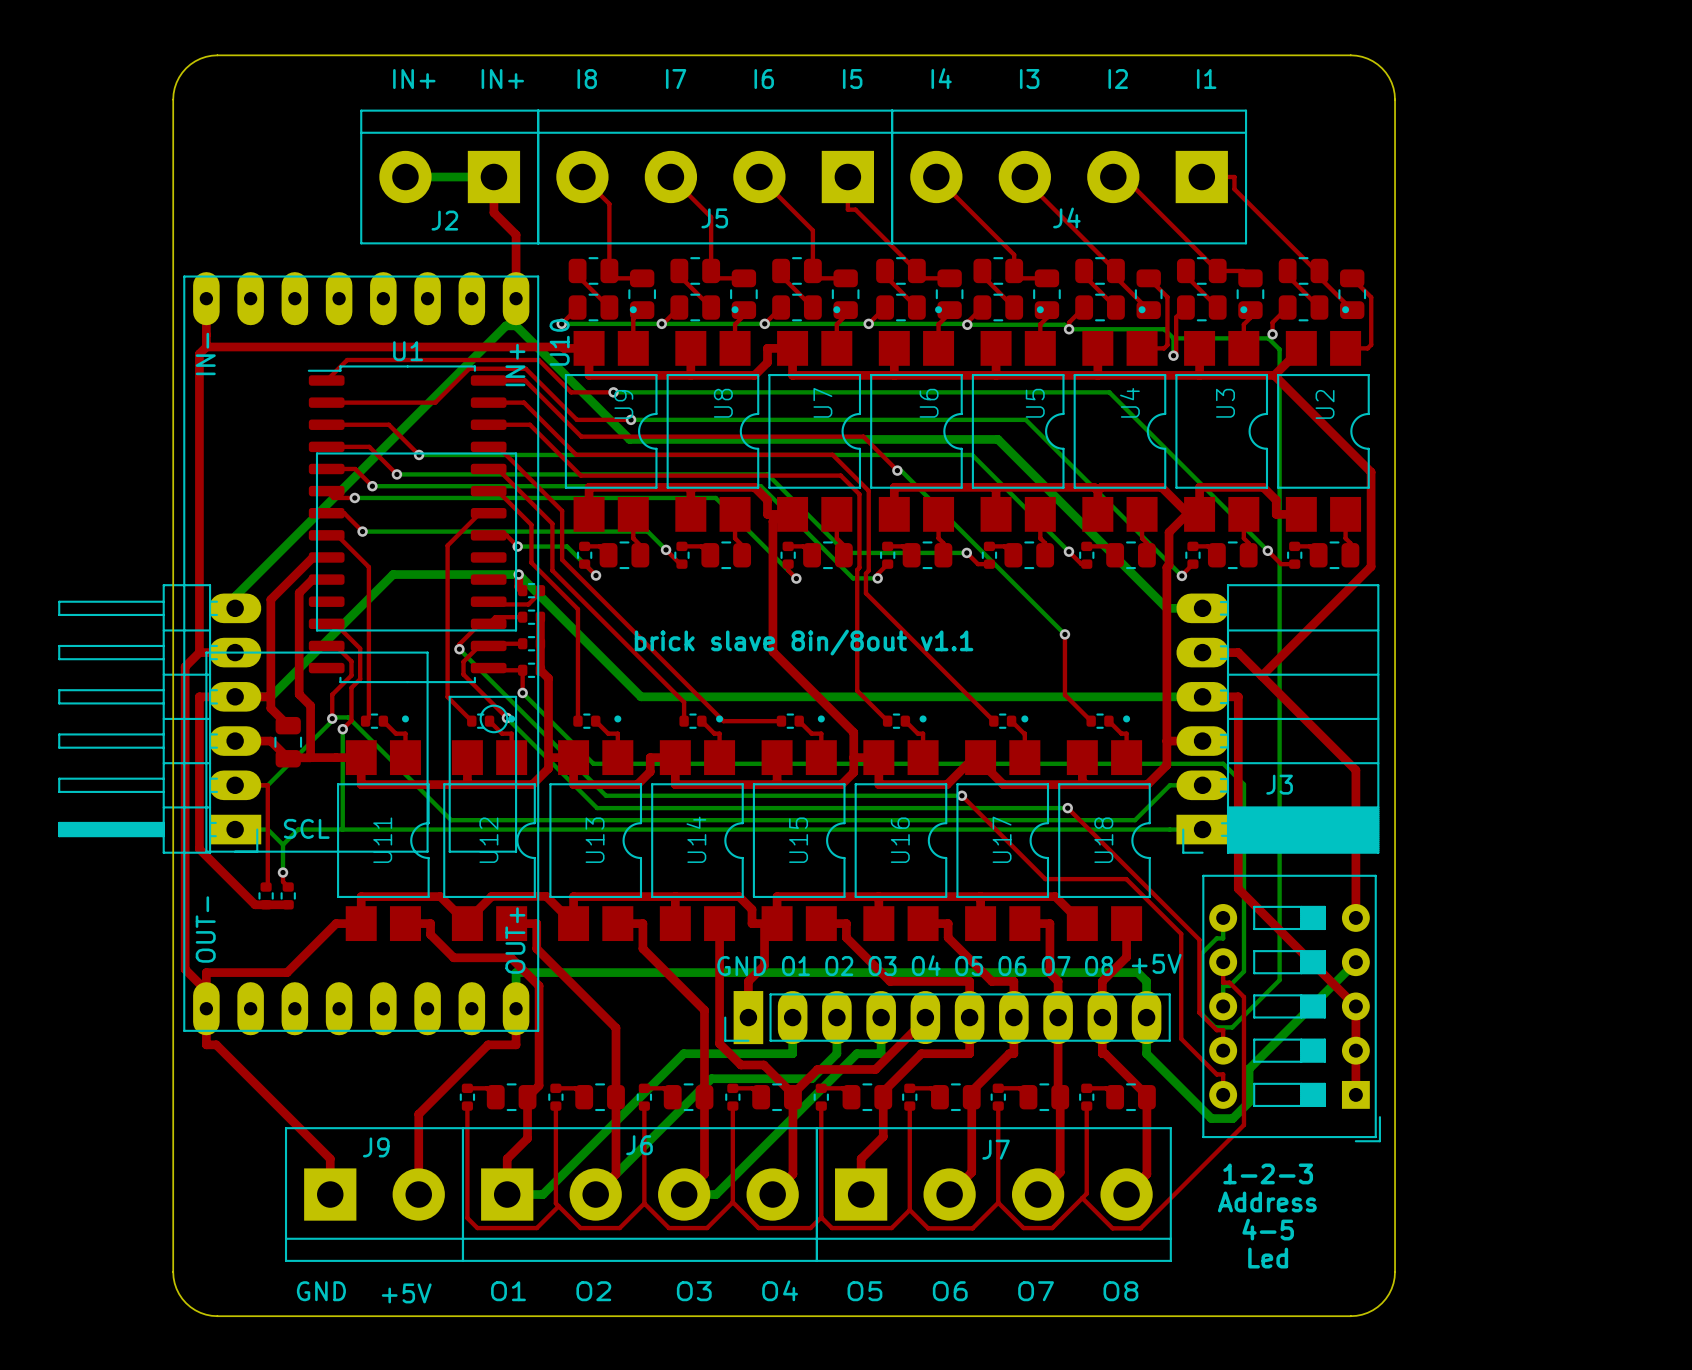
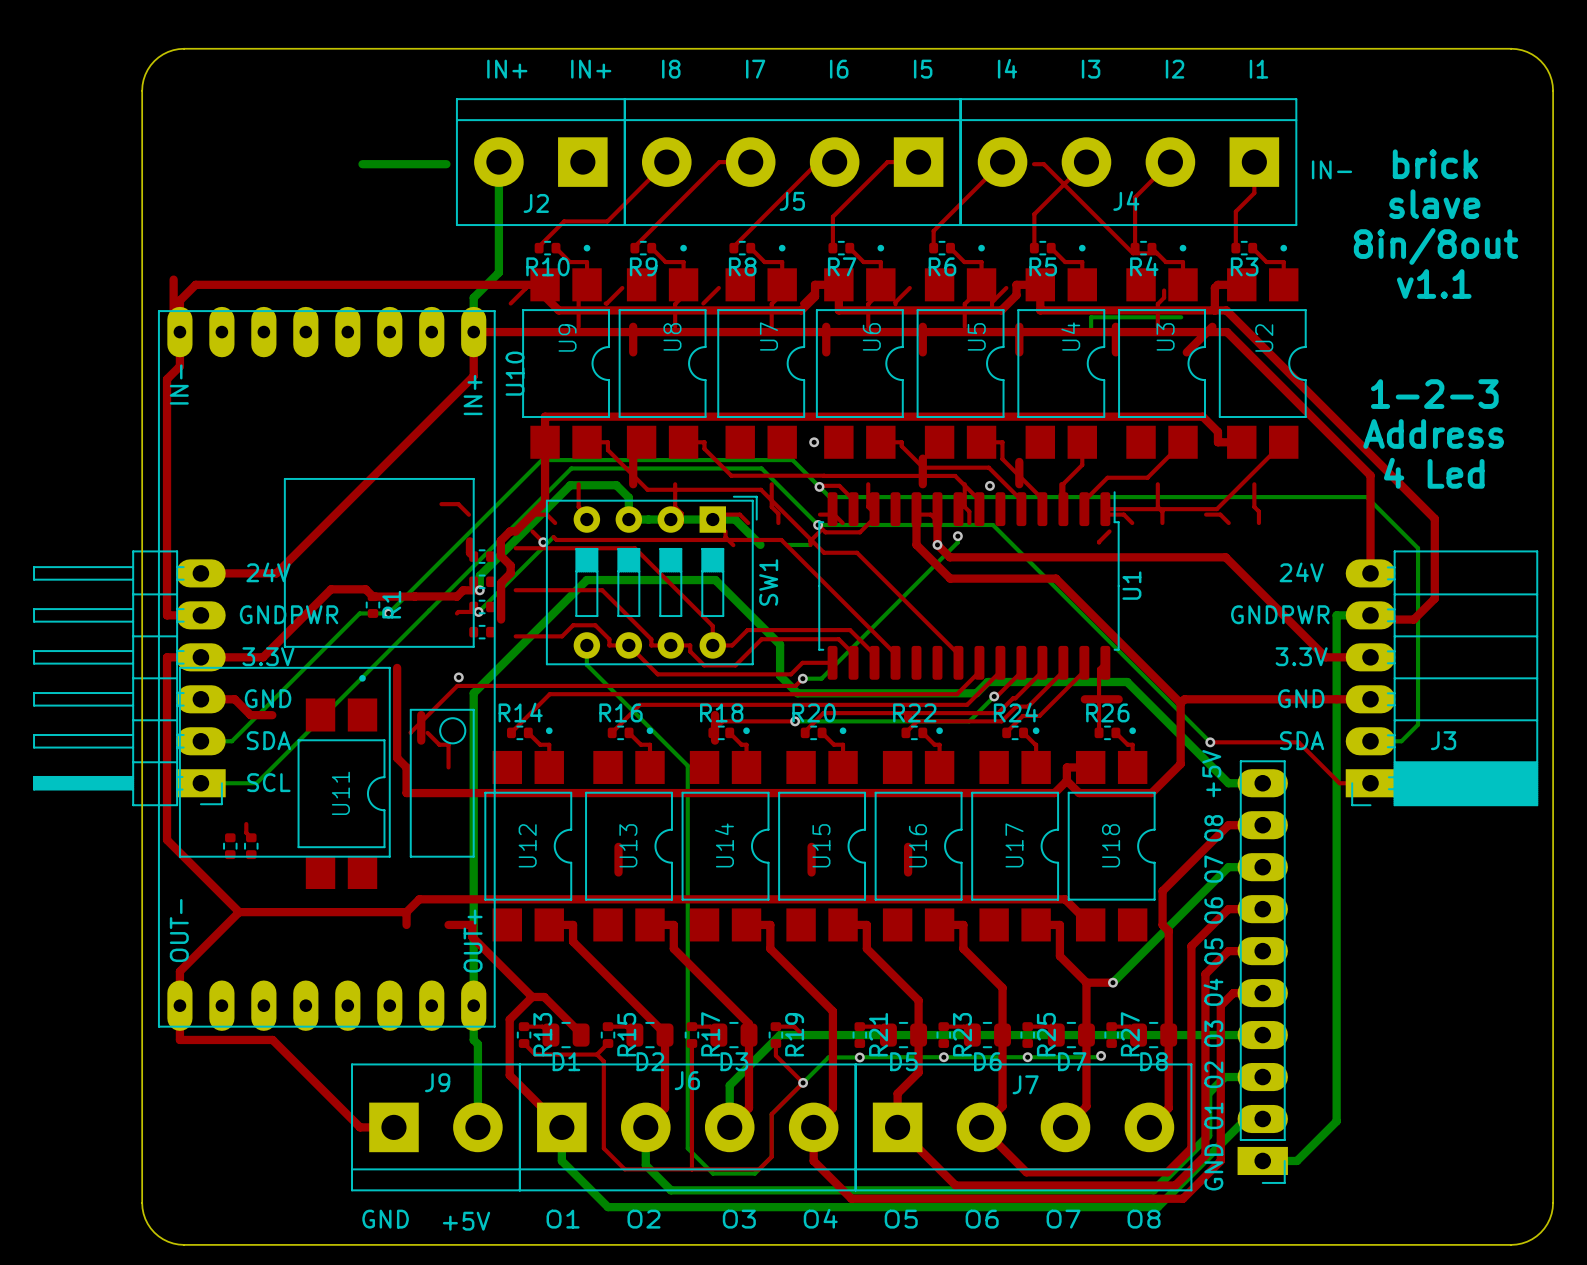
board edge: (1350, 55) (1367, 58) (1382, 68) (1391, 82) (1395, 99) (1395, 1271) (1391, 1288) (1382, 1303) (1367, 1312) (1350, 1316) -> (1259, 48) (1516, 49) (1527, 51) (1540, 61) (1549, 74) (1553, 90) (1551, 1213) (1540, 1232) (1532, 1239) (1516, 1244) (1259, 1244)
text: none -> IN+ (591, 69)
text position: I8 I7 I6 I5 I4 I3 I2 I1 (896, 78) -> I8 I7 I6 I5 I4 I3 I2 I1 (965, 68)
text: IN+ (414, 79) -> none
text position: IN+ (502, 79) -> IN+ (507, 69)
bottom track: none -> (498, 162) (498, 272) (473, 297) (473, 332)
top track: none -> (666, 162) (607, 221) (564, 221) (539, 248)
top track: none -> (750, 162) (719, 162) (634, 248)
top track: none -> (834, 162) (818, 162) (733, 248)
top track: none -> (918, 162) (887, 162) (832, 216) (832, 248)
top track: none -> (1002, 162) (933, 230) (933, 248)
top track: none -> (1086, 162) (1034, 214) (1034, 248)
top track: none -> (1170, 162) (1135, 197) (1135, 248)
top track: none -> (1254, 162) (1254, 193) (1235, 211) (1235, 248)
J2 position: (449, 177) -> (540, 162)
top track: (493, 177) (493, 212) (516, 234) (516, 298) -> none
top track: (582, 177) (609, 203) (609, 270) (616, 278) (642, 278) -> none
top track: (670, 177) (711, 217) (711, 270) (718, 278) (743, 278) -> none
J5 position: (715, 177) -> (792, 162)
top track: (759, 177) (812, 230) (812, 270) (820, 278) (845, 278) -> none
top track: (847, 177) (847, 209) (855, 209) (924, 278) (949, 278) -> none
top track: (936, 177) (1014, 254) (1014, 270) (1021, 278) (1046, 278) -> none
top track: (1024, 177) (1024, 179) (1115, 270) (1115, 277) (1148, 310) -> none
J4 position: (1069, 177) -> (1128, 162)
top track: (1201, 177) (1234, 177) (1234, 189) (1319, 274) -> none
text: none -> brick (1435, 164)
text: none -> IN- (1332, 169)
text: none -> slave (1434, 204)
text: none -> 8in/8out (1436, 246)
R10: none -> (547, 248)
top track: none -> (555, 248) (569, 262) (587, 262) (587, 284)
R9: none -> (643, 248)
top track: none -> (651, 248) (665, 262) (683, 262) (683, 284)
R8: none -> (742, 248)
top track: none -> (750, 248) (764, 262) (782, 262) (782, 284)
R7: none -> (841, 248)
top track: none -> (849, 248) (863, 262) (880, 262) (880, 284)
R6: none -> (942, 248)
top track: none -> (950, 248) (964, 262) (981, 262) (981, 284)
R5: none -> (1042, 248)
top track: none -> (1051, 248) (1065, 262) (1082, 262) (1082, 284)
R4: none -> (1143, 248)
R3: none -> (1244, 248)
top track: none -> (1252, 248) (1266, 262) (1283, 262) (1283, 284)
top track: (577, 270) (577, 275) (609, 307) -> none
part: (593, 270) -> none
top track: (679, 270) (679, 275) (711, 307) -> none
part: (695, 270) -> none
top track: (781, 270) (781, 275) (812, 307) -> none
part: (796, 270) -> none
top track: (885, 270) (885, 275) (916, 307) -> none
part: (900, 270) -> none
top track: (982, 270) (982, 275) (1014, 307) -> none
part: (998, 270) -> none
top track: (1084, 270) (1084, 275) (1115, 307) -> none
part: (1100, 270) -> none
top track: (1185, 270) (1185, 275) (1217, 307) -> none
part: (1201, 270) -> none
top track: (1287, 270) (1287, 275) (1319, 307) -> none
part: (1303, 270) -> none
top track: (1319, 270) (1319, 277) (1352, 310) -> none
top track: (1148, 278) (1167, 297) (1167, 345) (1164, 348) (1142, 348) -> none
top track: none -> (1164, 260) (1165, 262) (1183, 262) (1183, 284)
top track: (1352, 278) (1371, 297) (1371, 344) (1367, 348) (1345, 348) -> none
part: (642, 294) -> none
part: (743, 294) -> none
part: (845, 294) -> none
part: (949, 294) -> none
part: (1046, 294) -> none
part: (1148, 294) -> none
part: (1250, 294) -> none
part: (1352, 294) -> none
text: none -> v1.1 (1434, 283)
top track: none -> (533, 284) (558, 310) (801, 310) (815, 296) (815, 284) (838, 284) (838, 310) (1001, 310) (1016, 295) (1016, 284) (1040, 284) (1040, 310) (1226, 310) (1434, 518) (1434, 598) (1413, 619) (1374, 619) (1370, 615)
top track: none -> (1241, 284) (1217, 284) (1214, 287) (1214, 310)
part: (593, 307) -> none
part: (695, 307) -> none
part: (796, 307) -> none
part: (900, 307) -> none
part: (998, 307) -> none
part: (1100, 307) -> none
top track: (1185, 307) (1176, 317) (1176, 353) (1173, 355) -> none
part: (1201, 307) -> none
top track: (1287, 307) (1272, 322) (1272, 334) -> none
part: (1303, 307) -> none
bottom track: (561, 323) (1064, 324) (1069, 329) (1164, 329) (1173, 338) -> none
via: (561, 323) -> none
via: (661, 323) -> none
via: (764, 323) -> none
via: (868, 323) -> none
via: (967, 324) -> none
bottom track: (516, 325) (629, 439) (997, 439) (1166, 608) (1202, 608) -> none
bottom track: (516, 325) (505, 325) (235, 596) (235, 608) -> none
via: (1069, 329) -> none
bottom track: (1272, 334) (1268, 338) (1279, 349) (1279, 980) (1232, 1027) (1215, 1027) (1202, 1014) (1202, 953) (1216, 938) (1223, 938) (1223, 917) -> none
via: (1272, 334) -> none
via: (1173, 355) -> none
top track: (326, 380) (347, 360) (538, 360) (571, 392) (613, 392) -> none
top track: (488, 380) (525, 380) (581, 436) (863, 436) (897, 470) -> none
bottom track: (613, 392) (1109, 392) (1267, 550) -> none
via: (613, 392) -> none
top track: (326, 402) (435, 402) (469, 368) (525, 368) (576, 419) (631, 419) -> none
top track: (488, 402) (524, 402) (576, 454) (832, 454) (868, 490) (868, 570) (865, 573) (865, 593) (993, 721) -> none
top track: (199, 403) (199, 353) (206, 346) (589, 348) (589, 375) (754, 375) (767, 362) (767, 348) (792, 348) (792, 375) (1274, 375) (1371, 472) (1371, 566) (1261, 676) -> (167, 379) (179, 366) (179, 300) (195, 284) (545, 284)
U9 name position: U9 (623, 404) -> U9 (567, 337)
U9 position: (611, 419) -> (566, 351)
bottom track: (631, 419) (1025, 419) (1181, 575) -> none
via: (631, 419) -> none
U8 position: (712, 419) -> (662, 351)
U7 position: (814, 419) -> (761, 351)
U6 position: (916, 419) -> (859, 351)
U5 position: (1018, 419) -> (960, 351)
U4 position: (1119, 419) -> (1061, 351)
U3 position: (1221, 419) -> (1162, 351)
U2 position: (1323, 419) -> (1262, 351)
text: none -> 1-2-3 (1434, 394)
top track: (326, 424) (388, 424) (419, 454) -> none
top track: (488, 424) (529, 424) (580, 475) (840, 475) (859, 494) (857, 690) (887, 721) -> none
top track: (326, 446) (369, 446) (396, 474) -> none
top track: (488, 446) (498, 446) (562, 510) (562, 559) (723, 721) (781, 721) -> none
bottom track: (419, 454) (972, 454) (1068, 551) -> none
via: (419, 454) -> none
text: none -> Address (1433, 433)
top track: (326, 468) (355, 468) (372, 486) -> none
top track: (488, 468) (497, 468) (552, 523) (552, 570) (684, 702) (684, 721) -> none
top track: none -> (587, 442) (607, 442) (607, 450) (647, 489) (760, 489) (823, 552) (857, 552) (958, 654) (958, 662)
top track: none -> (683, 442) (704, 442) (704, 448) (731, 475) (824, 475)
bottom track: (897, 470) (901, 470) (1064, 634) -> none
via position: (897, 470) -> (814, 442)
top track: none -> (880, 442) (901, 442) (901, 446) (923, 467) (988, 467) (1021, 500) (1021, 509)
top track: none -> (981, 442) (1002, 442) (1002, 459) (1042, 499) (1042, 509)
top track: none -> (1082, 442) (1082, 465) (1063, 483) (1063, 509)
top track: none -> (1183, 442) (1147, 477) (1107, 477) (1084, 500) (1084, 509)
top track: none -> (1241, 442) (1217, 442) (1217, 431) (1202, 416) (545, 416) (545, 502) (515, 531) (510, 531) (500, 540) (500, 555) (510, 565) (510, 573) (501, 582) (501, 619)
top track: none -> (1283, 442) (1216, 509) (1105, 509)
bottom track: (396, 474) (767, 474) (846, 552) (966, 552) -> none
via: (396, 474) -> none
bottom track: (372, 486) (760, 486) (853, 578) -> none
via: (372, 486) -> none
top track: (326, 491) (333, 497) (354, 497) -> none
top track: (488, 491) (497, 491) (531, 524) (531, 562) (577, 609) (577, 721) -> none
bottom track: (354, 497) (715, 497) (796, 578) -> none
via: (354, 497) -> none
text: none -> 4 Led (1434, 473)
top track: none -> (824, 475) (955, 475) (979, 500) (979, 509)
top track: (326, 513) (344, 513) (362, 531) -> none
top track: (488, 513) (479, 513) (447, 545) (447, 696) (471, 721) -> none
top track: (589, 514) (589, 487) (754, 487) (767, 500) (767, 514) (792, 514) -> none
top track: (780, 514) (772, 521) (772, 651) (853, 732) (853, 772) (841, 784) (675, 784) (675, 757) (650, 757) (650, 771) (637, 784) (573, 784) (573, 757) (548, 757) -> none
top track: (894, 514) (894, 487) (1094, 487) (1097, 490) (1101, 487) (1161, 487) (1187, 514) -> none
top track: (1187, 514) (1169, 532) (1169, 565) (1166, 567) (1166, 765) (1147, 784) (1085, 784) (1082, 781) -> none
top track: (1187, 514) (1199, 514) (1199, 487) (1263, 487) (1276, 500) (1276, 514) (1301, 514) -> none
via: none -> (989, 485)
top track: none -> (819, 486) (839, 485) (853, 500) (853, 509)
via: none -> (819, 486)
U1 rotation: 0° (407, 524) -> 90° clockwise (968, 585)
U1 position: (407, 524) -> (968, 585)
bottom track: (362, 531) (647, 531) (666, 549) -> none
via: (362, 531) -> none
top track: (326, 535) (337, 535) (368, 567) (368, 717) (365, 721) -> none
top track: none -> (874, 509) (874, 517) (860, 532) (825, 532) (818, 524)
top track: none -> (916, 509) (916, 544) (950, 578) (1056, 578) (1180, 703)
top track: none -> (937, 509) (937, 544) (949, 557) (1225, 557) (1325, 657) (1370, 657)
bottom track: (517, 546) (567, 546) (596, 575) -> none
via: (517, 546) -> none
top track: (681, 546) (701, 546) (710, 555) -> none
top track: (1086, 546) (1106, 546) (1115, 555) -> none
top track: (666, 549) (681, 564) -> none
via: (666, 549) -> none
top track: (1267, 550) (1281, 564) (1294, 564) -> none
via: (1267, 550) -> none
top track: (1068, 551) (1081, 564) (1086, 564) -> none
via: (1068, 551) -> none
top track: (966, 552) (978, 564) (989, 564) -> none
via: (966, 552) -> none
part: (584, 555) -> none
part: (624, 555) -> none
part: (681, 555) -> none
part: (726, 555) -> none
part: (788, 555) -> none
part: (827, 555) -> none
part: (887, 555) -> none
part: (927, 555) -> none
part: (989, 555) -> none
part: (1029, 555) -> none
part: (1086, 555) -> none
part: (1131, 555) -> none
part: (1192, 555) -> none
part: (1232, 555) -> none
part: (1294, 555) -> none
part: (1334, 555) -> none
top track: (326, 557) (312, 557) (270, 599) (270, 708) (288, 725) -> none
top track: none -> (553, 537) (556, 539) (781, 539) (895, 654) (895, 662)
bottom track: none -> (553, 537) (478, 611)
bottom track: none -> (957, 536) (957, 542) (821, 678) (802, 678)
via: none -> (957, 536)
via: (518, 574) -> none
via: (1181, 575) -> none
via: (796, 578) -> none
bottom track: none -> (760, 544) (735, 519) (628, 519) (628, 497) (616, 485) (570, 485) (479, 575) (479, 590)
via position: (877, 578) -> (818, 524)
via: none -> (937, 544)
top track: (326, 579) (312, 579) (299, 592) (299, 694) (310, 705) (310, 757) (361, 757) (361, 784) (532, 784) (548, 768) (548, 678) (540, 670) (540, 617) -> none
top track: none -> (515, 548) (635, 548) (712, 626) (712, 645) (732, 645) (747, 630) (850, 630) (874, 654) (874, 662)
top track: (540, 590) (528, 604) (491, 604) (488, 601) -> none
text: none -> 24V (268, 572)
text: none -> 24V (1301, 572)
top track: none -> (200, 573) (276, 573) (473, 376) (473, 332) (1227, 332) (1370, 475) (1370, 573)
SW1: none -> (651, 580)
top track: (522, 617) (495, 617) (488, 623) (479, 623) (459, 644) (459, 649) -> none
top track: (326, 623) (335, 623) (360, 648) (360, 679) (351, 687) (351, 720) (342, 729) -> none
top track: none -> (479, 590) (463, 590) (456, 596)
via: none -> (479, 590)
top track: none -> (515, 590) (602, 590) (651, 639) (651, 645) (690, 645) (690, 651) (704, 665) (735, 665) (761, 639) (838, 639) (853, 654) (853, 662)
top track: none -> (415, 596) (456, 596)
top track: none -> (414, 596) (372, 596) (365, 589) (331, 589) (263, 657) (234, 657)
top track: (1064, 634) (1064, 694) (1091, 721) -> none
via: (1064, 634) -> none
R1: none -> (372, 605)
text: brick slave 8in/8out v1.1 (804, 642) -> none
top track: (522, 643) (490, 643) (488, 645) (479, 645) (463, 661) (463, 674) (506, 717) -> none
top track: (326, 645) (335, 645) (351, 661) (351, 675) (332, 694) (332, 718) -> none
bottom track: (459, 649) (605, 795) (961, 795) -> none
via position: (459, 649) -> (388, 613)
top track: none -> (478, 611) (456, 613)
via: none -> (478, 611)
text: none -> GNDPWR (289, 614)
text: none -> GNDPWR (1280, 614)
top track: (199, 652) (185, 666) (185, 969) (206, 990) -> none
top track: (1202, 652) (1238, 652) (1355, 770) (1355, 917) -> none
bottom track: none -> (1370, 615) (1336, 615) (1336, 1121) (1297, 1160) (1262, 1160)
U10 position: (361, 653) -> (326, 668)
top track: (488, 668) (490, 670) (522, 670) (522, 692) -> none
top track: none -> (515, 636) (562, 636) (573, 625) (595, 625) (609, 639) (609, 645) (628, 645) (657, 674) (791, 674) (802, 662) (832, 662)
bottom track: none -> (586, 645) (586, 664) (687, 765) (687, 1148) (712, 1173) (754, 1173) (771, 1156) (771, 1114) (828, 1057) (859, 1057)
bottom track: (522, 692) (593, 763) (1223, 763) (1243, 784) (1243, 971) (1229, 985) (1223, 985) (1223, 1006) -> none
via: (522, 692) -> none
bottom track: (235, 696) (270, 696) (393, 574) (518, 574) (641, 696) (1202, 696) -> none
text: none -> 3.3V (268, 656)
top track: (1202, 696) (1238, 696) (1238, 888) (1355, 1006) (1355, 1094) -> none
text: none -> 3.3V (1301, 656)
top track: none -> (979, 662) (979, 671) (957, 694) (549, 694) (511, 732)
top track: none -> (1000, 662) (1000, 671) (967, 704) (639, 704) (612, 732)
top track: none -> (1021, 662) (1021, 671) (996, 696) (994, 696)
top track: none -> (1042, 662) (1042, 671) (998, 713) (823, 713) (805, 732)
top track: none -> (1063, 662) (1063, 671) (1028, 706) (1016, 706) (1001, 721) (917, 721) (905, 732)
top track: none -> (1084, 662) (1084, 671) (1039, 715) (1022, 715) (1006, 732)
top track: none -> (1105, 662) (1099, 669) (1099, 732)
top track: none -> (397, 667) (397, 758) (406, 767) (406, 793) (1054, 793) (1066, 780)
bottom track: (506, 717) (597, 808) (1067, 808) -> none
via: (332, 718) -> none
J3 position: (1277, 718) -> (1441, 678)
top track: none -> (802, 678) (795, 685) (457, 685) (410, 732)
via: none -> (802, 678)
bottom track: (332, 720) (333, 717) (348, 717) (451, 820) (1135, 820) (1169, 785) (1202, 785) -> (293, 680) (359, 613) (388, 613) (542, 460) (792, 460) (829, 497) (1366, 497) (1418, 548) (1418, 724) (1401, 741) (1370, 741)
part: (374, 721) -> none
top track: (383, 721) (395, 733) (405, 733) (405, 757) -> (427, 732) (439, 744) (448, 744) (448, 767)
part: (480, 721) -> none
top track: (489, 721) (502, 733) (511, 733) (511, 757) -> (528, 732) (540, 744) (549, 744) (549, 767)
part: (586, 721) -> none
top track: (595, 721) (608, 733) (617, 733) (617, 757) -> (629, 732) (640, 744) (649, 744) (649, 767)
part: (692, 721) -> none
top track: (701, 721) (714, 733) (719, 733) (719, 757) -> (729, 732) (741, 744) (746, 744) (746, 767)
part: (790, 721) -> none
top track: (799, 721) (811, 733) (821, 733) (821, 757) -> (822, 732) (833, 744) (843, 744) (843, 767)
part: (896, 721) -> none
top track: (905, 721) (917, 733) (923, 733) (923, 757) -> (922, 732) (934, 744) (939, 744) (939, 767)
part: (1002, 721) -> none
top track: (1011, 721) (1024, 733) (1024, 757) -> (1023, 732) (1036, 744) (1036, 767)
part: (1100, 721) -> none
top track: (1108, 721) (1121, 733) (1126, 733) (1126, 757) -> (1115, 732) (1127, 744) (1132, 744) (1132, 767)
bottom track: (342, 729) (342, 829) -> none
via: (342, 729) -> none
bottom track: none -> (994, 696) (969, 721) (795, 721)
via: none -> (994, 696)
text: none -> GND (268, 698)
text: none -> GND (1301, 698)
top track: none -> (1370, 699) (1184, 699) (1180, 703)
part: (288, 742) -> none
top track: none -> (1180, 703) (1180, 764) (1151, 793) (1079, 793) (1066, 780)
top track: (853, 757) (878, 757) (878, 784) (947, 784) (969, 761) (980, 761) (1003, 784) (1082, 784) (1082, 757) -> none
top track: none -> (795, 721) (722, 721) (712, 732)
via: none -> (795, 721)
R14: none -> (519, 732)
R16: none -> (620, 732)
R18: none -> (721, 732)
R20: none -> (813, 732)
R22: none -> (914, 732)
R24: none -> (1015, 732)
R26: none -> (1107, 732)
text: none -> SDA (268, 740)
text: none -> SDA (1302, 740)
top track: (235, 785) (267, 785) (267, 885) (266, 887) -> none
top track: none -> (1210, 742) (1298, 742) (1339, 783) (1370, 783)
via: none -> (1210, 742)
top track: (961, 795) (1045, 879) (1126, 879) (1181, 933) (1181, 1038) (1216, 1074) (1223, 1074) (1223, 1094) -> (1111, 1026) (1130, 1026) (1138, 1035)
via: (961, 795) -> none
top track: (1067, 808) (1199, 939) (1199, 1012) (1216, 1030) (1223, 1030) (1223, 1050) -> none
via: (1067, 808) -> none
top track: none -> (1090, 767) (1066, 767) (1066, 780)
U12 position: (489, 828) -> (528, 834)
U13 position: (595, 828) -> (629, 834)
U14 position: (697, 828) -> (725, 834)
U15 position: (799, 828) -> (822, 834)
U16 position: (900, 828) -> (918, 834)
U17 position: (1002, 828) -> (1015, 834)
U18 position: (1104, 828) -> (1111, 834)
bottom track: (267, 829) (283, 844) -> (231, 783) (256, 783) (571, 468) (761, 468) (818, 524) (992, 524) (1210, 742)
bottom track: (1202, 829) (298, 829) (283, 844) -> none
bottom track: none -> (1262, 783) (1228, 783) (1127, 682) (987, 682) (976, 693) (797, 693) (780, 675) (780, 644) (715, 580) (586, 580) (473, 693) (473, 1039) (477, 1044) (477, 1127)
bottom track: (283, 844) (283, 872) -> none
top track: (199, 849) (255, 904) (288, 904) -> (167, 801) (167, 839) (239, 912)
via: (283, 872) -> none
top track: none -> (1262, 825) (1228, 825) (1162, 891) (1162, 924) (1168, 931) (1168, 1108) (1149, 1127)
bottom track: none -> (1262, 867) (1228, 867) (1112, 982)
top track: (465, 922) (491, 896) (546, 896) (573, 923) (573, 896) (739, 896) (752, 909) (752, 923) (777, 923) (777, 896) (1055, 896) (1082, 923) -> none
top track: (405, 923) (430, 923) (430, 934) (453, 957) (510, 957) (539, 985) (539, 1085) (527, 1097) (527, 1138) (507, 1158) (507, 1194) -> none
top track: (467, 923) (440, 896) (361, 896) (361, 923) (336, 923) (287, 972) (206, 972) (206, 1044) (216, 1044) (330, 1158) (330, 1194) -> none
top track: (511, 923) (536, 923) (536, 948) (615, 1027) (615, 1174) (595, 1194) -> none
top track: (617, 923) (642, 923) (642, 948) (704, 1010) (704, 1174) (684, 1194) -> none
top track: (719, 923) (719, 1043) (740, 1065) (763, 1065) (792, 1094) -> none
top track: (764, 923) (764, 965) (748, 981) (748, 1017) -> none
top track: (821, 923) (846, 923) (846, 937) (890, 981) (969, 981) (969, 1053) (921, 1053) (883, 1091) (883, 1136) (861, 1158) (861, 1194) -> none
top track: (923, 923) (948, 923) (948, 937) (991, 981) (1013, 981) (1013, 1053) (1009, 1053) (971, 1091) (971, 1172) (949, 1194) -> none
top track: (1024, 923) (1049, 923) (1049, 973) (1058, 981) (1060, 1172) (1038, 1194) -> none
top track: (1126, 923) (1126, 957) (1102, 981) (1102, 1053) (1105, 1053) (1146, 1095) (1146, 1174) (1126, 1194) -> none
top track: (1223, 962) (1223, 982) (1229, 982) (1243, 997) (1243, 1125) (1140, 1228) (1112, 1228) (1082, 1198) -> none
top track: none -> (1262, 909) (1228, 909) (1191, 946) (1191, 1148) (1167, 1172) (1026, 1172) (981, 1127) (1002, 1106) (1002, 987) (963, 948) (963, 924) (939, 924)
bottom track: (1355, 962) (1249, 1069) (1249, 1102) (1232, 1118) (1211, 1118) (1146, 1053) (1146, 981) (1137, 972) (516, 972) (516, 1008) -> none
text rotation: 0° (1156, 963) -> 90° counterclockwise (1211, 773)
text position: +5V (1156, 963) -> +5V (1211, 773)
top track: none -> (239, 912) (406, 912)
top track: none -> (239, 912) (179, 971) (179, 1039) (272, 1039) (360, 1127) (393, 1127)
top track: none -> (406, 912) (419, 899) (1065, 899) (1090, 924)
top track: none -> (406, 912) (406, 924)
text: O1 O2 O3 O4 O5 O6 O7 O8 (947, 965) -> none
text: GND (741, 966) -> none
top track: none -> (448, 924) (472, 924) (472, 937) (532, 996)
top track: none -> (549, 924) (573, 924) (573, 941) (665, 1033) (665, 1108) (645, 1127)
top track: none -> (649, 924) (673, 924) (673, 948) (749, 1023) (749, 1108) (729, 1127)
top track: none -> (746, 924) (770, 924) (770, 948) (832, 1011) (832, 1108) (813, 1127) (813, 1160) (851, 1198) (1183, 1198) (1220, 1160) (1220, 1005) (1233, 993) (1262, 993)
top track: none -> (843, 924) (866, 924) (866, 948) (918, 1000) (918, 1072) (897, 1093) (897, 1127) (955, 1185) (1175, 1185) (1205, 1155) (1205, 974) (1228, 951) (1262, 951)
top track: none -> (1036, 924) (1059, 924) (1059, 956) (1086, 982)
top track: (516, 1008) (516, 1044) (488, 1044) (418, 1114) (418, 1194) -> none
part: (1291, 1008) -> none
bottom track: (792, 1017) (792, 1053) (683, 1053) (542, 1194) (507, 1194) -> none
bottom track: (836, 1017) (836, 1053) (811, 1078) (711, 1078) (595, 1194) -> none
bottom track: (881, 1017) (881, 1053) (856, 1053) (716, 1194) (684, 1194) -> none
top track: (925, 1017) (875, 1069) (817, 1069) (792, 1094) -> none
part rotation: 0° (947, 1017) -> 90° counterclockwise (1262, 972)
part position: (947, 1017) -> (1262, 972)
text: none -> O1 O2 O3 O4 O5 O6 O7 O8 (1213, 972)
top track: none -> (1086, 982) (1086, 1106) (1065, 1127)
top track: none -> (1086, 982) (1112, 982)
via: none -> (1112, 982)
top track: none -> (532, 996) (509, 1019) (509, 1075) (561, 1127)
top track: none -> (532, 996) (544, 996) (581, 1035)
top track: (467, 1088) (486, 1088) (495, 1097) -> (524, 1026) (542, 1026) (550, 1035)
top track: (555, 1088) (575, 1088) (584, 1097) -> (608, 1026) (626, 1026) (634, 1035)
top track: (644, 1088) (663, 1088) (672, 1097) -> (691, 1026) (710, 1026) (718, 1035)
top track: (732, 1088) (752, 1088) (761, 1097) -> (775, 1026) (794, 1026) (802, 1035)
top track: (821, 1088) (842, 1088) (851, 1097) -> (859, 1026) (880, 1026) (888, 1035)
top track: (909, 1088) (931, 1088) (939, 1097) -> (943, 1026) (963, 1026) (972, 1035)
top track: (998, 1088) (1019, 1088) (1028, 1097) -> (1027, 1026) (1047, 1026) (1056, 1035)
top track: (1086, 1088) (1106, 1088) (1115, 1097) -> none
R13: none -> (524, 1035)
D1: none -> (566, 1035)
R15: none -> (608, 1035)
D2: none -> (649, 1035)
R17: none -> (691, 1035)
top track: (792, 1094) (792, 1174) (772, 1194) -> none
D3: none -> (733, 1035)
R19: none -> (775, 1035)
R21: none -> (859, 1035)
D5: none -> (903, 1035)
R23: none -> (943, 1035)
D6: none -> (987, 1035)
R25: none -> (1027, 1035)
D7: none -> (1071, 1035)
R27: none -> (1111, 1035)
D8: none -> (1153, 1035)
bottom track: none -> (1262, 1035) (780, 1035) (729, 1085) (729, 1127)
part: (467, 1097) -> none
part: (511, 1097) -> none
part: (555, 1097) -> none
part: (600, 1097) -> none
part: (644, 1097) -> none
part: (688, 1097) -> none
part: (732, 1097) -> none
part: (777, 1097) -> none
part: (821, 1097) -> none
part: (867, 1097) -> none
part: (909, 1097) -> none
part: (955, 1097) -> none
part: (998, 1097) -> none
part: (1044, 1097) -> none
part: (1086, 1097) -> none
part: (1131, 1097) -> none
top track: none -> (524, 1043) (535, 1054) (596, 1054)
top track: none -> (608, 1043) (596, 1054)
top track: none -> (691, 1043) (691, 1169)
top track: none -> (775, 1043) (775, 1055) (803, 1082) (771, 1114) (771, 1156) (759, 1169) (624, 1169) (603, 1148) (603, 1061) (596, 1054)
top track: (467, 1106) (467, 1218) (477, 1228) (536, 1228) (558, 1206) -> none
top track: (555, 1106) (555, 1203) (580, 1228) (619, 1228) (644, 1203) -> none
top track: (644, 1106) (644, 1203) -> none
top track: (732, 1106) (732, 1202) -> none
top track: (821, 1106) (821, 1217) -> none
top track: (909, 1106) (909, 1210) -> none
top track: (998, 1106) (998, 1202) -> none
top track: (1086, 1106) (1086, 1193) (1052, 1228) (1023, 1228) (998, 1202) -> none
bottom track: none -> (1101, 1055) (860, 1057)
via: none -> (1101, 1055)
via: none -> (859, 1057)
via: none -> (943, 1057)
via: none -> (1027, 1057)
bottom track: none -> (1262, 1077) (1224, 1077) (1208, 1093) (1208, 1135) (1153, 1190) (670, 1190) (645, 1165) (645, 1127)
via: none -> (803, 1082)
text: 1-2-3 (1268, 1173) -> none
bottom track: none -> (1262, 1119) (1245, 1119) (1157, 1207) (608, 1207) (561, 1160) (561, 1127)
J9 position: (374, 1194) -> (435, 1127)
J6 position: (639, 1194) -> (687, 1127)
J7 position: (993, 1194) -> (1023, 1127)
text: Address (1267, 1201) -> none
top track: (732, 1202) (707, 1228) (668, 1228) (644, 1203) -> none
top track: (732, 1202) (758, 1228) (810, 1228) (821, 1217) -> none
top track: (998, 1202) (972, 1228) (928, 1228) (909, 1210) -> none
top track: (909, 1210) (891, 1228) (831, 1228) (821, 1217) -> none
text: 4-5 (1268, 1229) -> none
text: none -> GND (1213, 1167)
text: Led (1268, 1258) -> none
text position: O1 O2 O3 O4 O5 O6 O7 O8 (814, 1290) -> O1 O2 O3 O4 O5 O6 O7 O8 (853, 1218)
text position: GND (321, 1291) -> GND (385, 1219)
text position: +5V (406, 1293) -> +5V (466, 1221)

